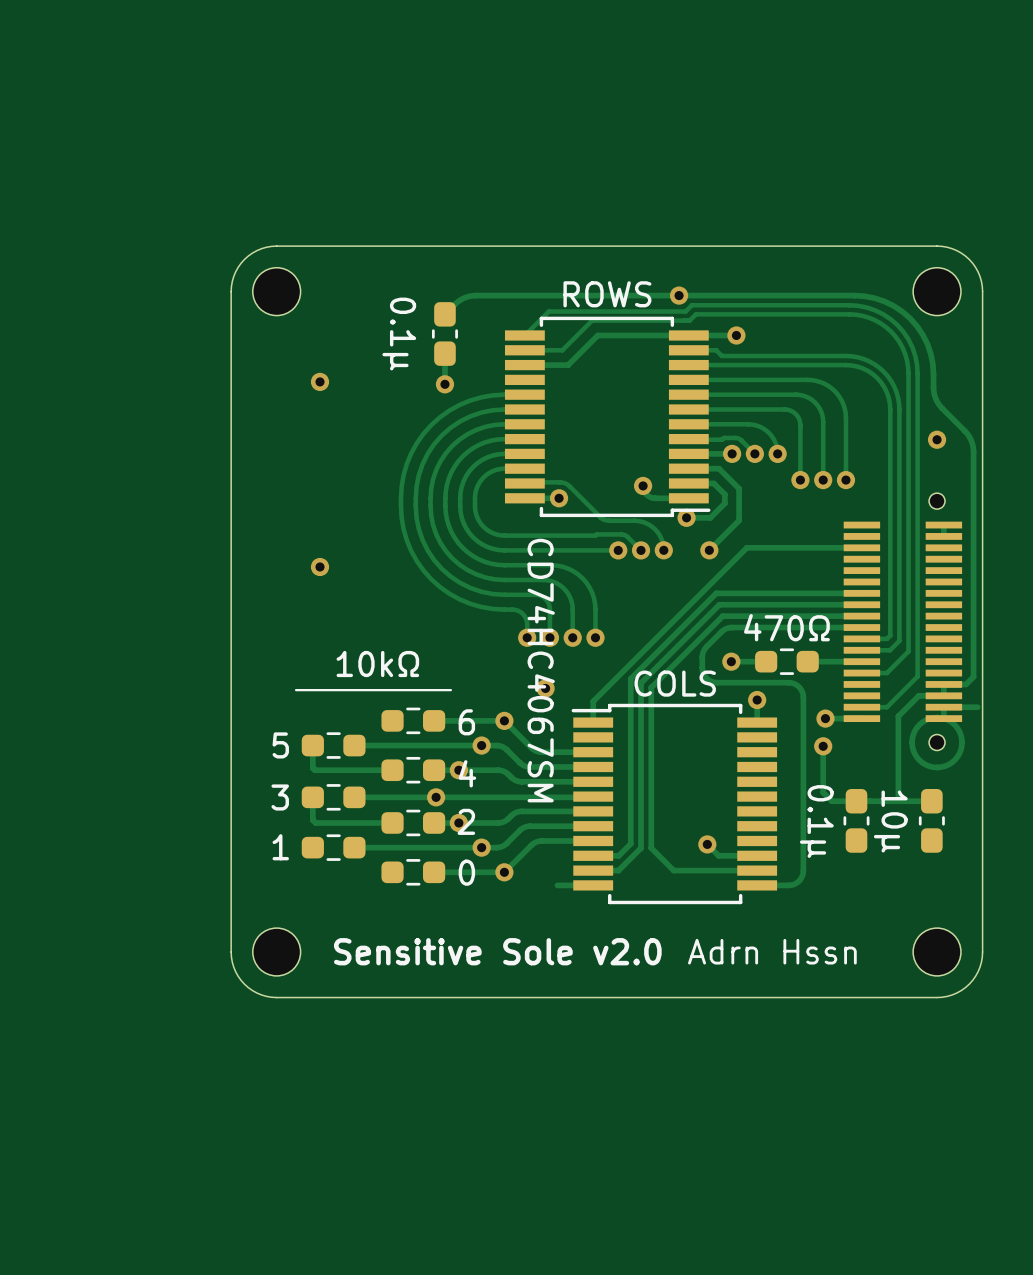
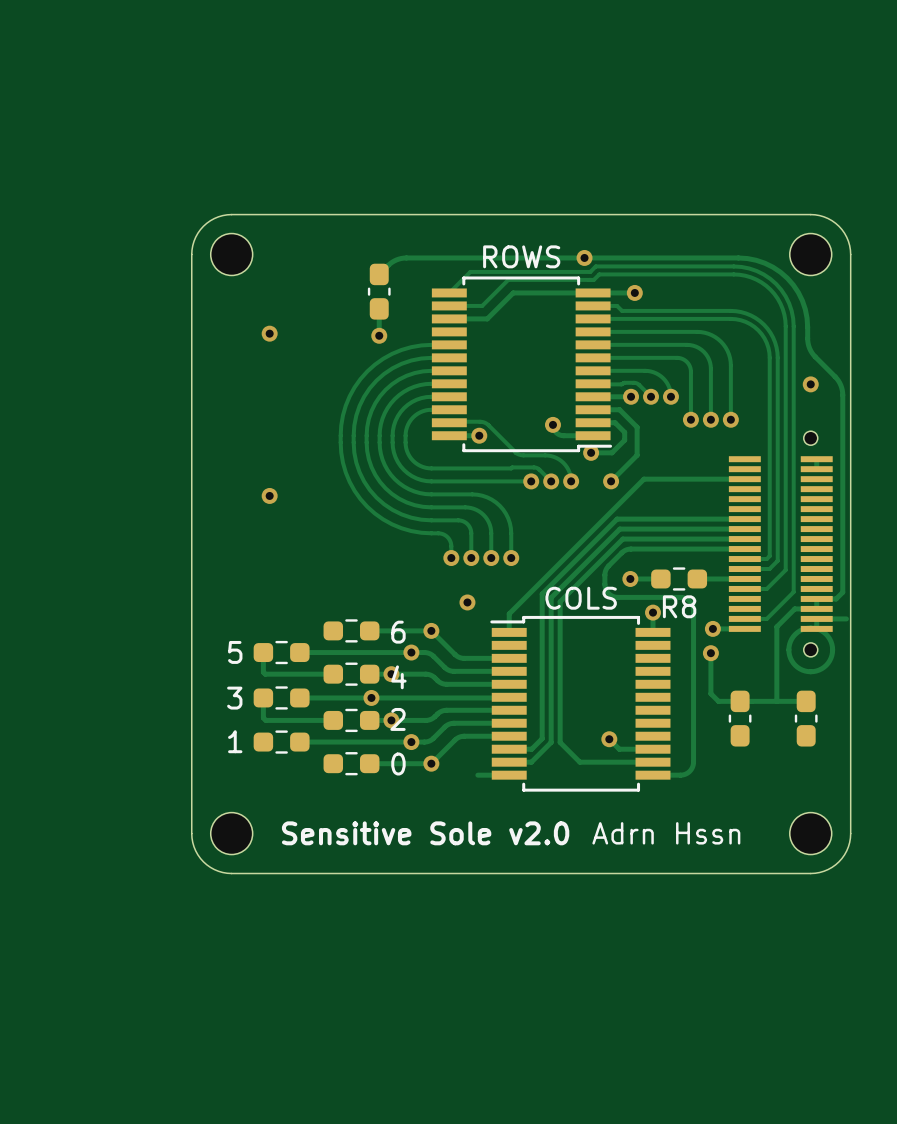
part value: 0.1µ (399, 334) -> none
R8 value: 470Ω (786, 627) -> none
0 value: 10kΩ (377, 664) -> none
ROWS value: CD74HC4067SM (541, 670) -> none
line: (450, 690) (296, 690) -> none
R8 name: none -> R8 (679, 606)
part value: 0.1µ (816, 821) -> none
part value: 10µ (890, 821) -> none

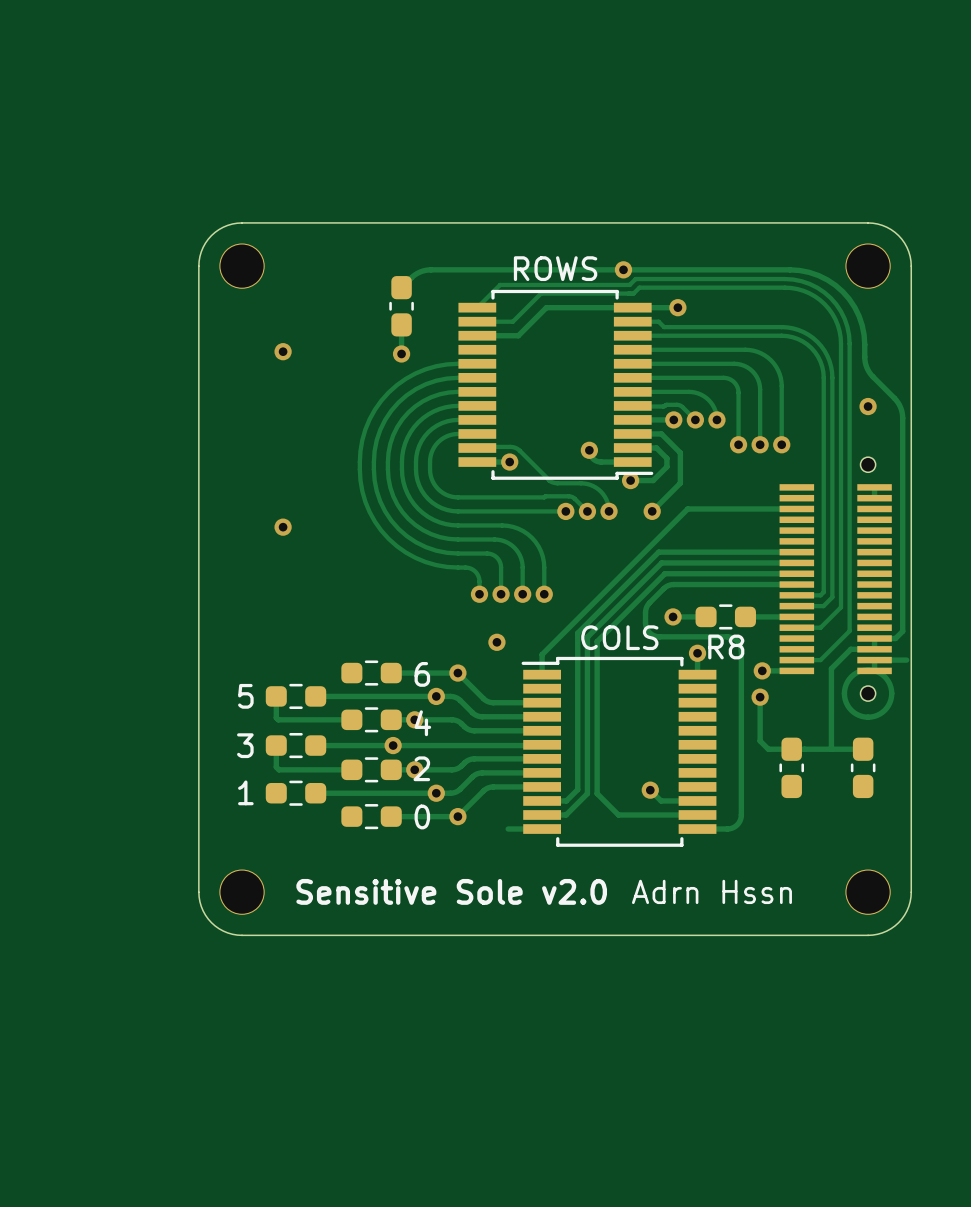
part footprint: [210, 233, 253, 276] -> [219, 243, 265, 289]
part footprint: [789, 233, 832, 276] -> [845, 243, 891, 289]
part footprint: [210, 812, 253, 855] -> [219, 869, 265, 915]
part footprint: [789, 812, 832, 855] -> [845, 869, 891, 915]

